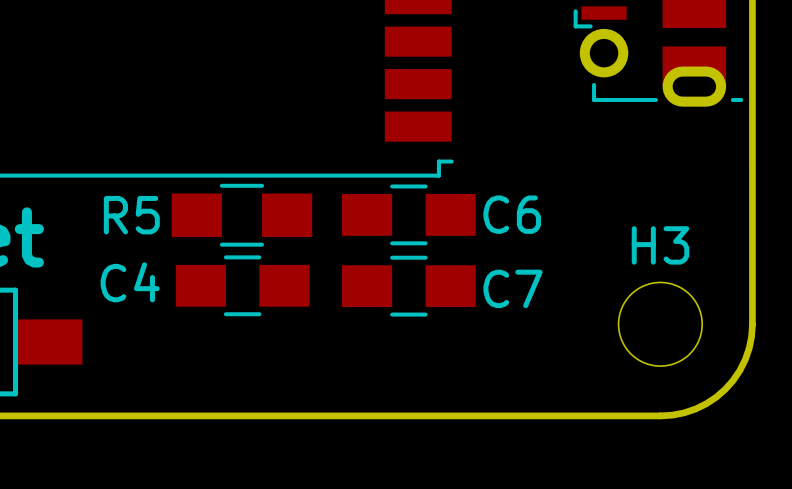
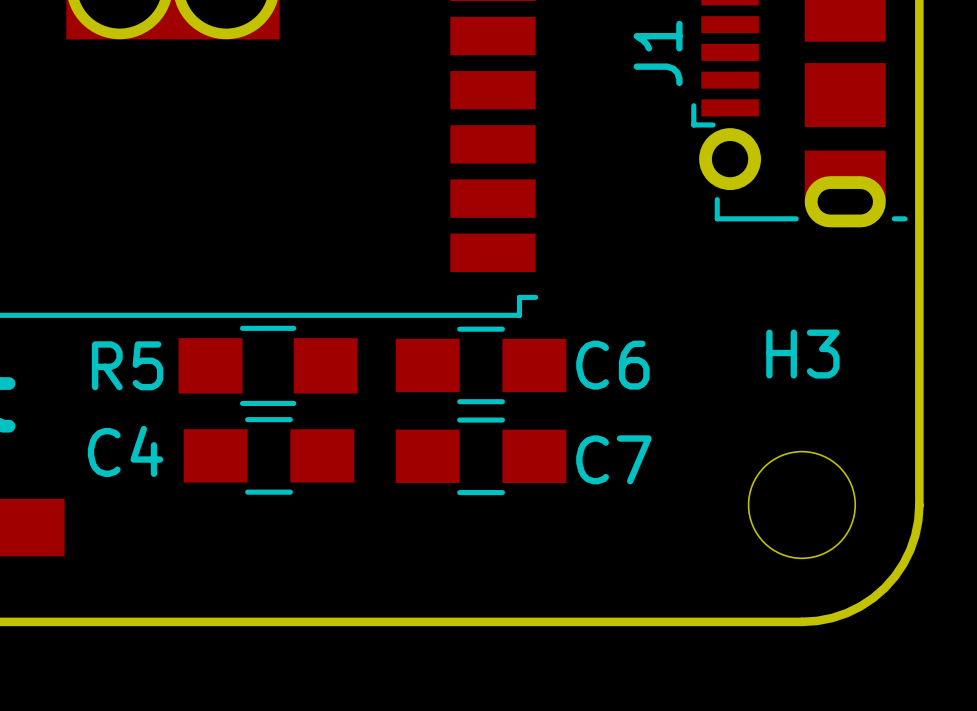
H3 name position: H3 (660, 245) -> H3 (802, 354)

